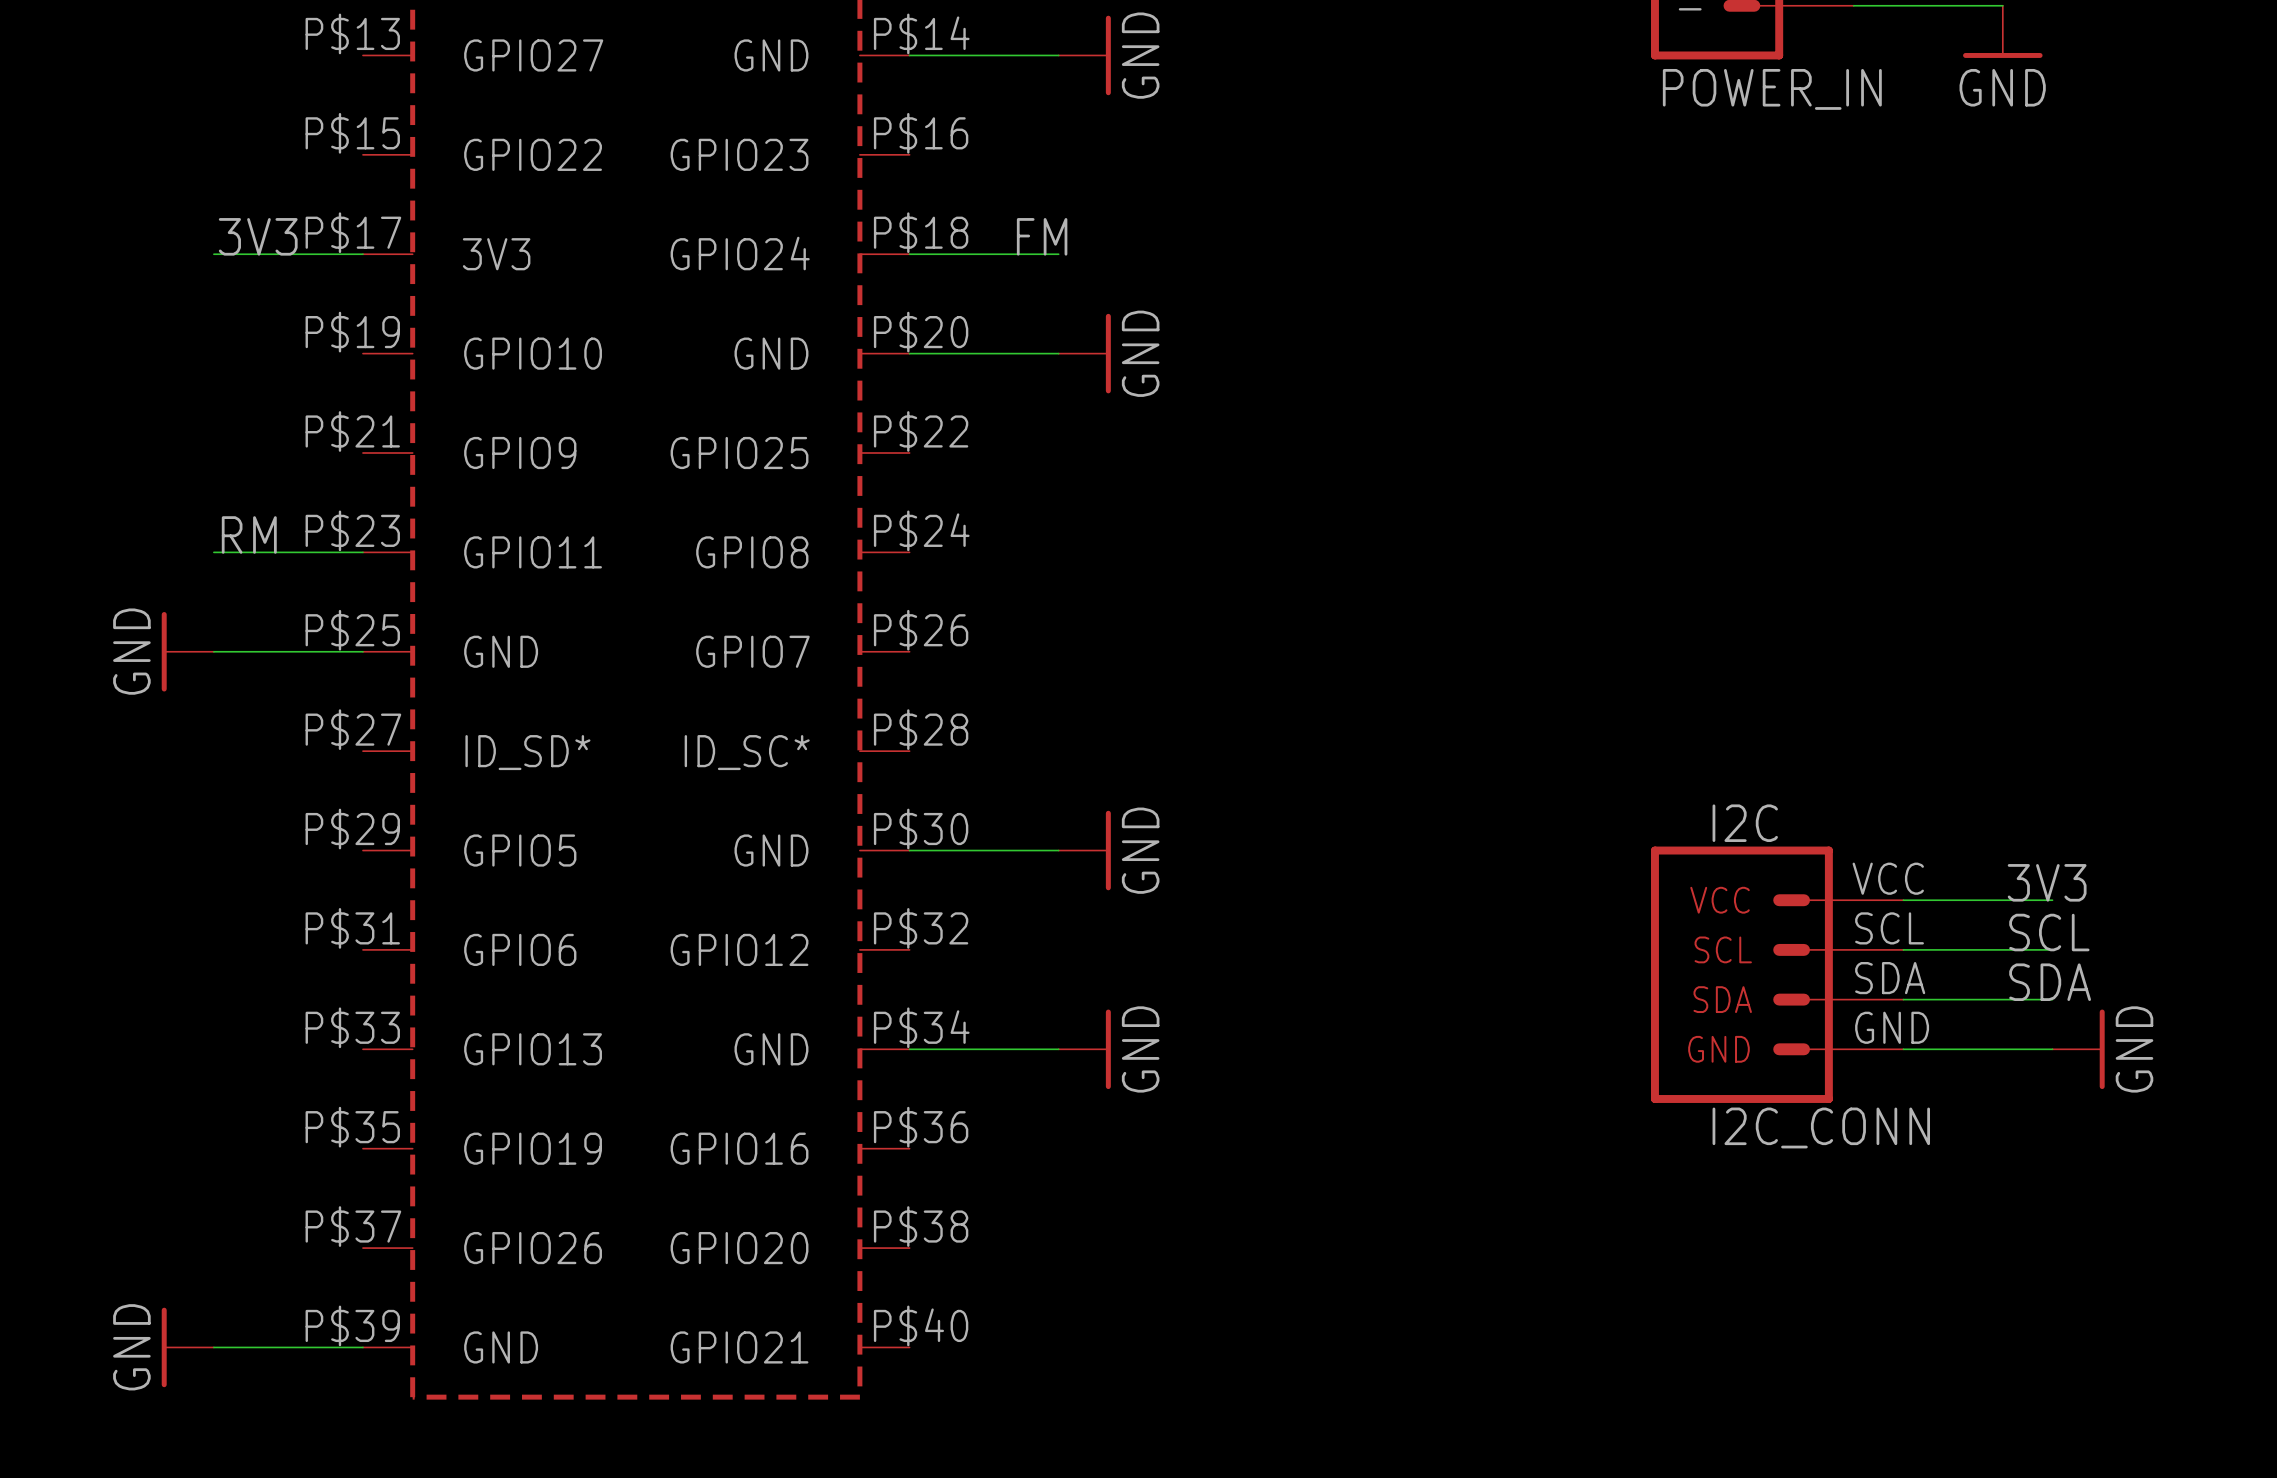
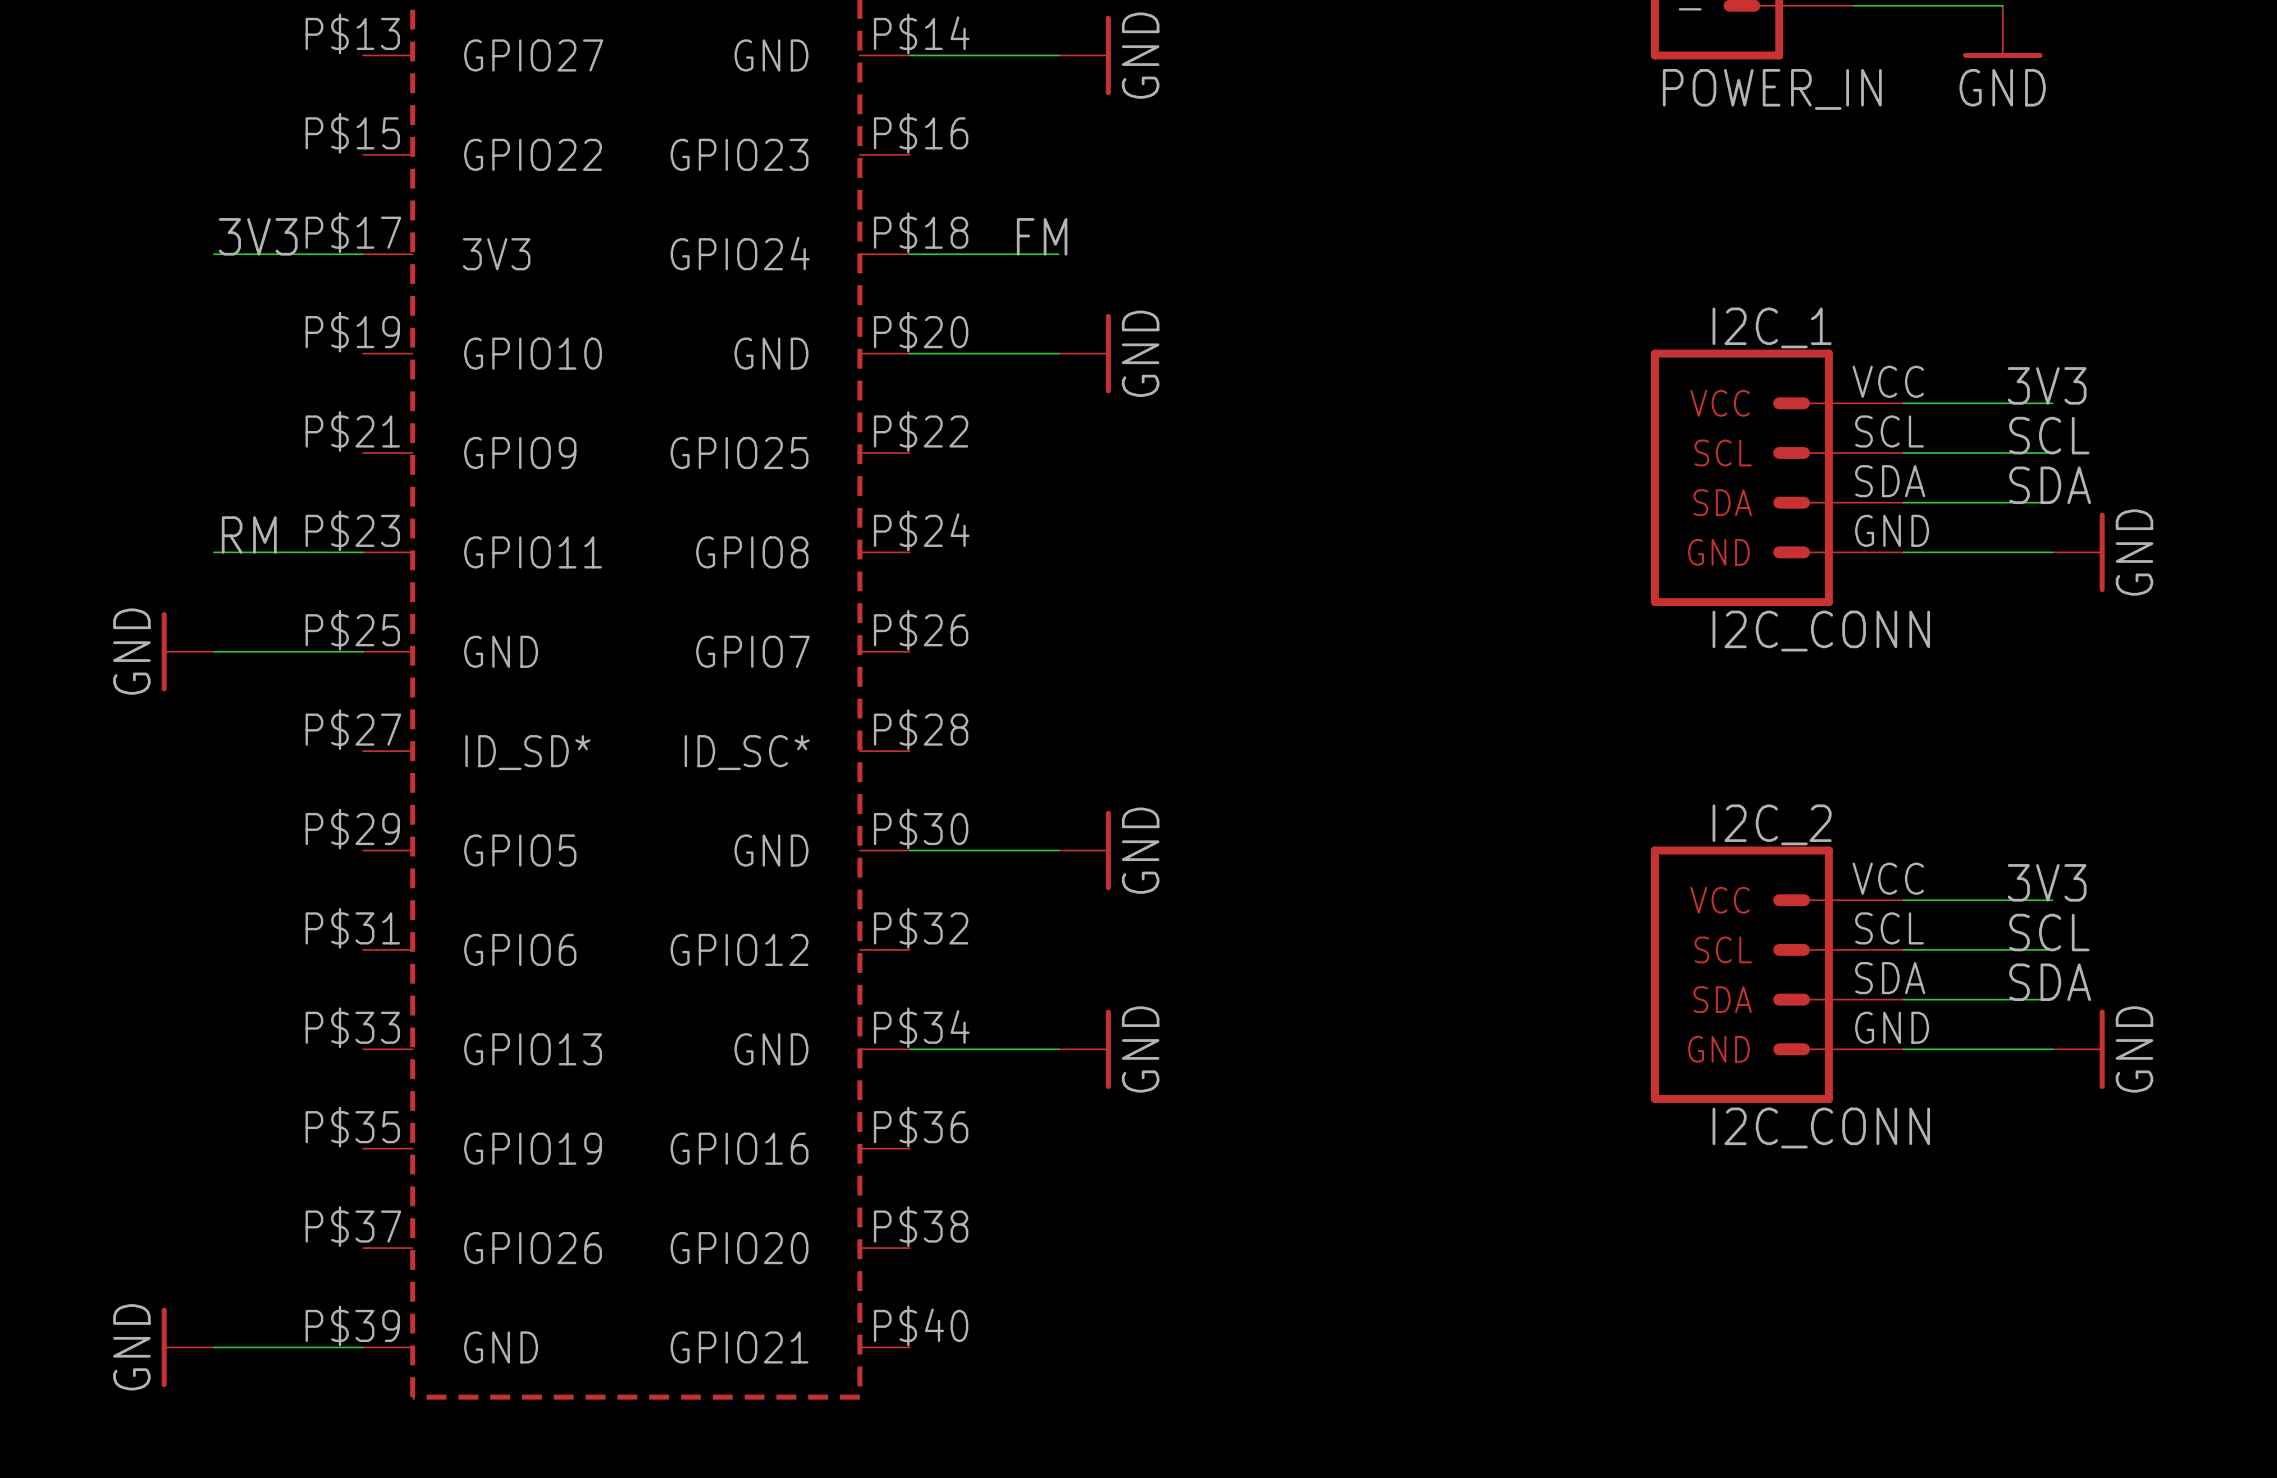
label: none -> 3V3 (2047, 385)
wire: none -> (1903, 403) (2052, 403)
label: none -> SCL (2049, 435)
wire: none -> (1903, 452) (2052, 452)
I2C_1: none -> I2C_CONN (1777, 477)
label: none -> SDA (2050, 485)
wire: none -> (1903, 502) (2052, 502)
wire: none -> (1903, 552) (2052, 552)
power symbol: none -> GND (2078, 552)
I2C name: I2C (1745, 823) -> I2C_2 (1772, 824)

